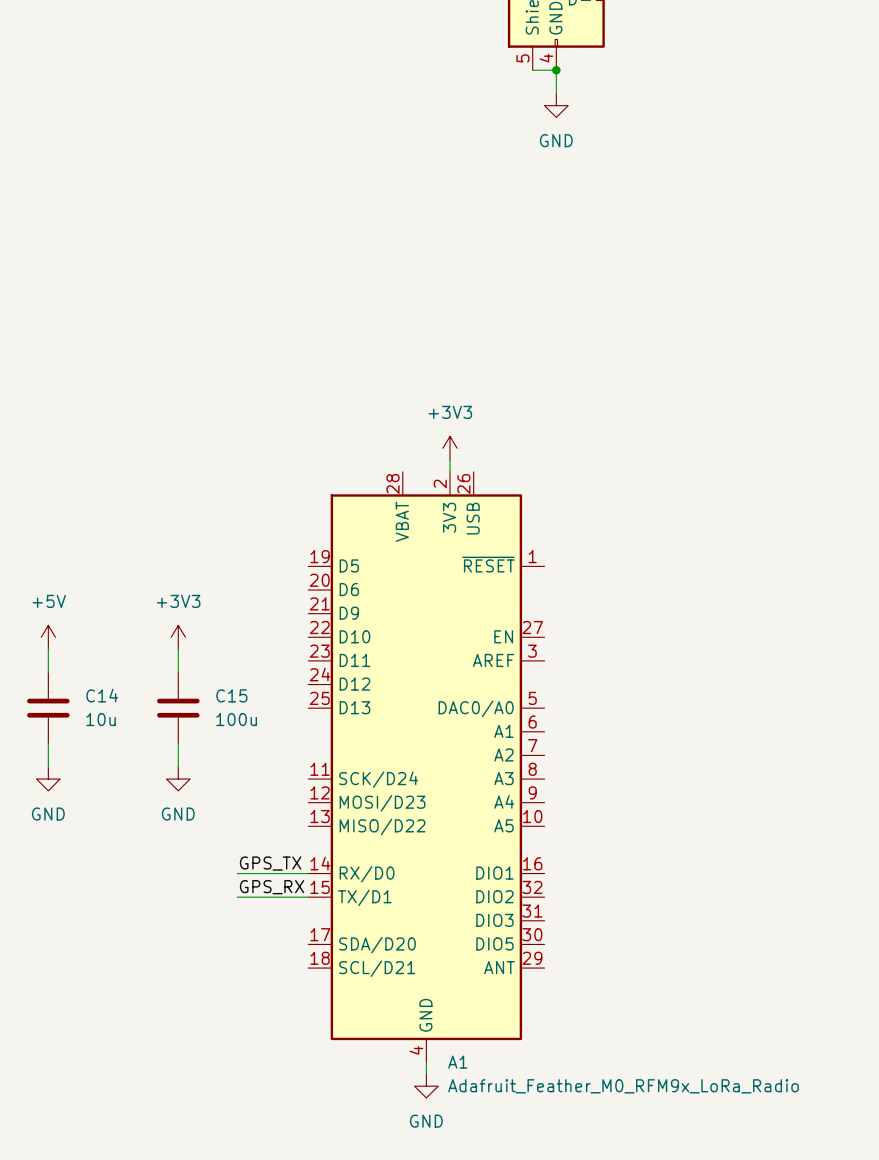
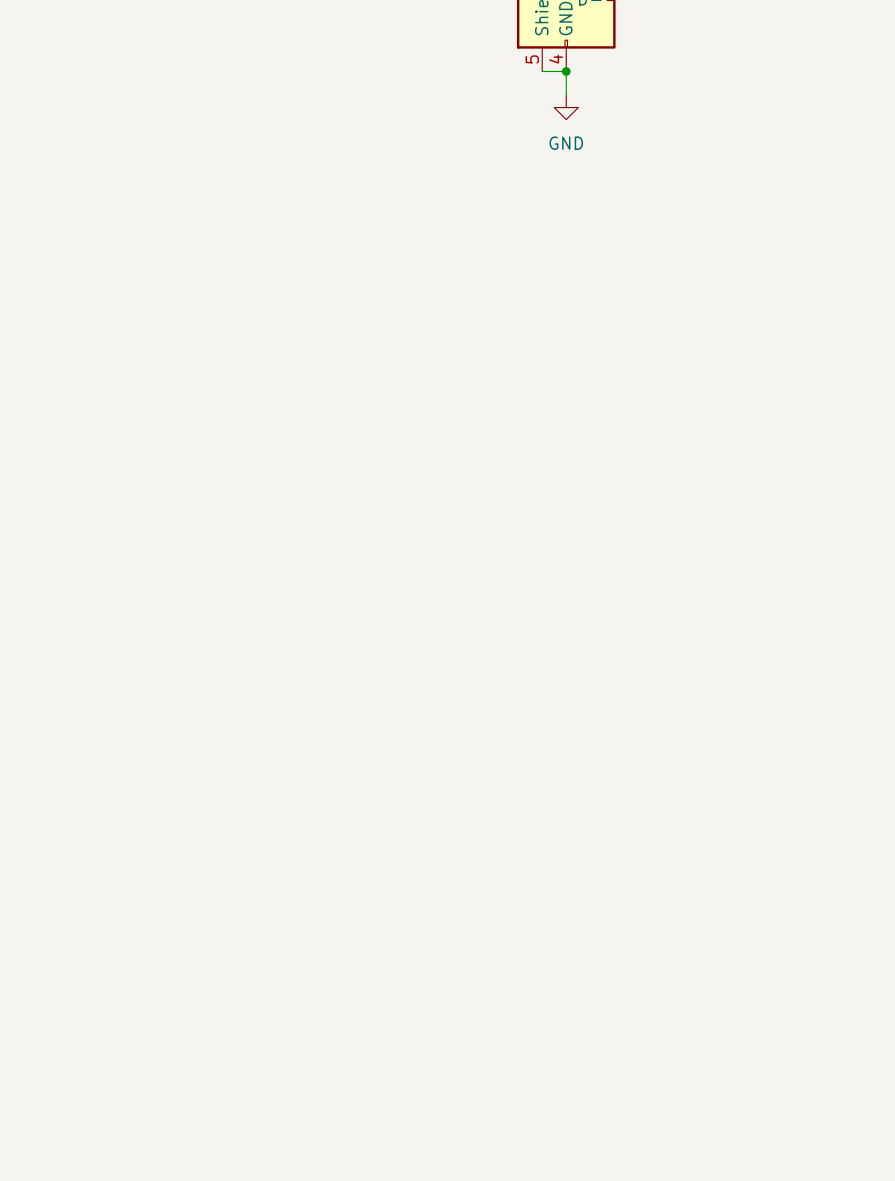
power symbol: +3V3 (450, 448) -> none
wire: (450, 460) (450, 471) -> none
power symbol: +5V (48, 637) -> none
power symbol: +3V3 (178, 637) -> none
wire: (48, 649) (48, 672) -> none
wire: (178, 649) (178, 672) -> none
C14: 10u (48, 708) -> none
C15: 100u (178, 708) -> none
wire: (48, 743) (48, 767) -> none
wire: (178, 743) (178, 767) -> none
A1: Adafruit_Feather_M0_RFM9x_LoRa_Radio (426, 767) -> none
power symbol: GND (48, 779) -> none
power symbol: GND (178, 779) -> none
label: GPS_TX (270, 863) -> none
wire: (237, 873) (308, 873) -> none
label: GPS_RX (272, 887) -> none
wire: (237, 897) (308, 897) -> none
wire: (426, 1062) (426, 1074) -> none
power symbol: GND (426, 1086) -> none

